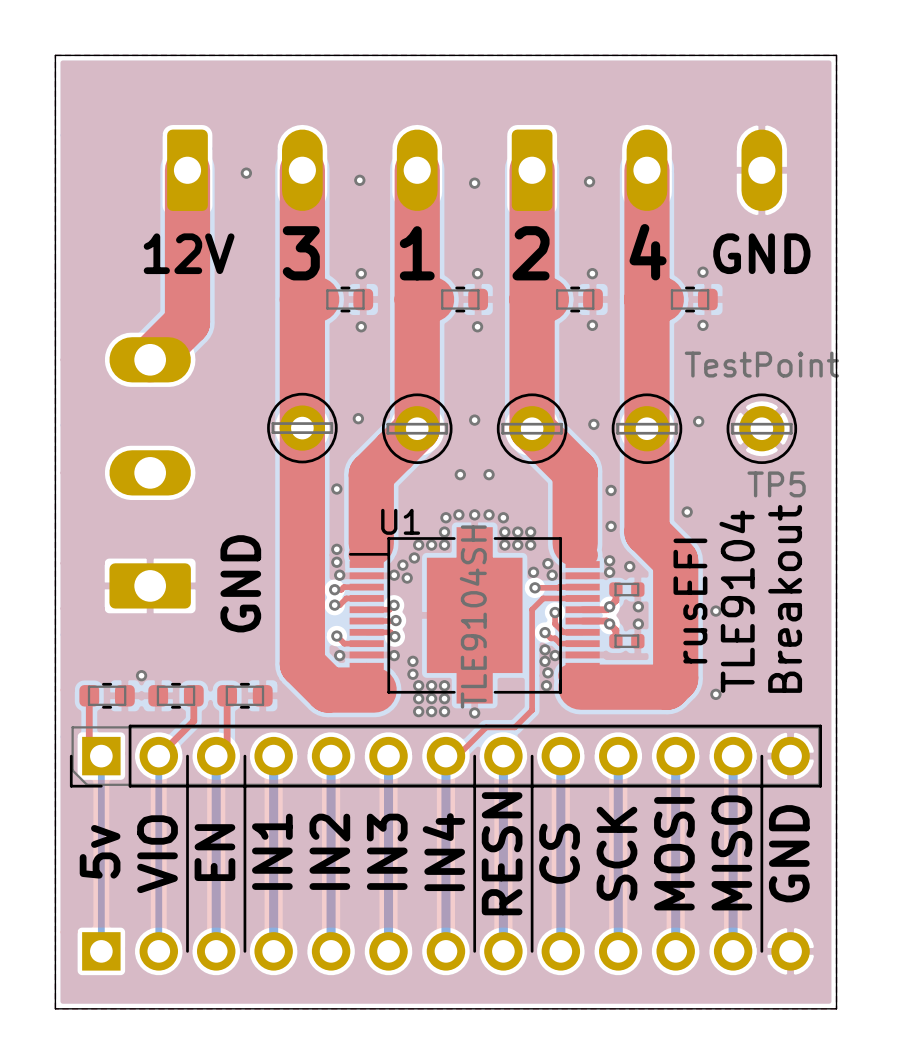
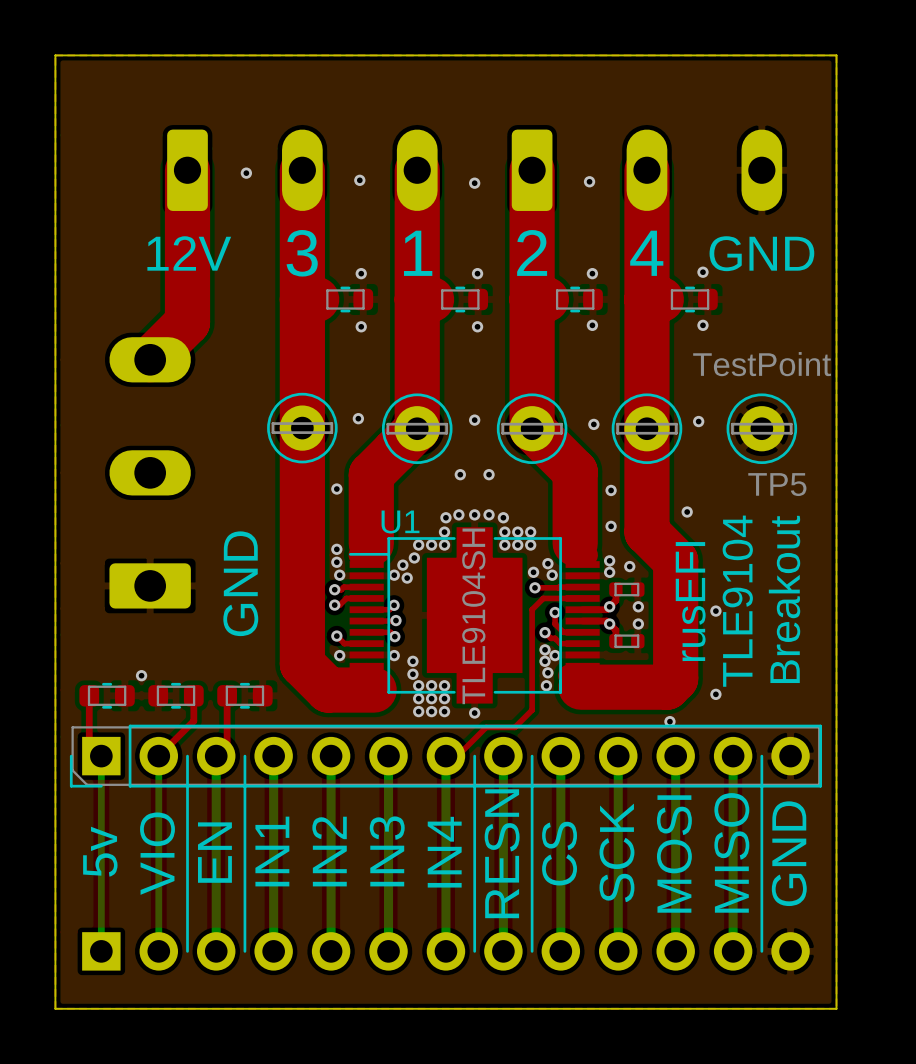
via: none -> (669, 721)

